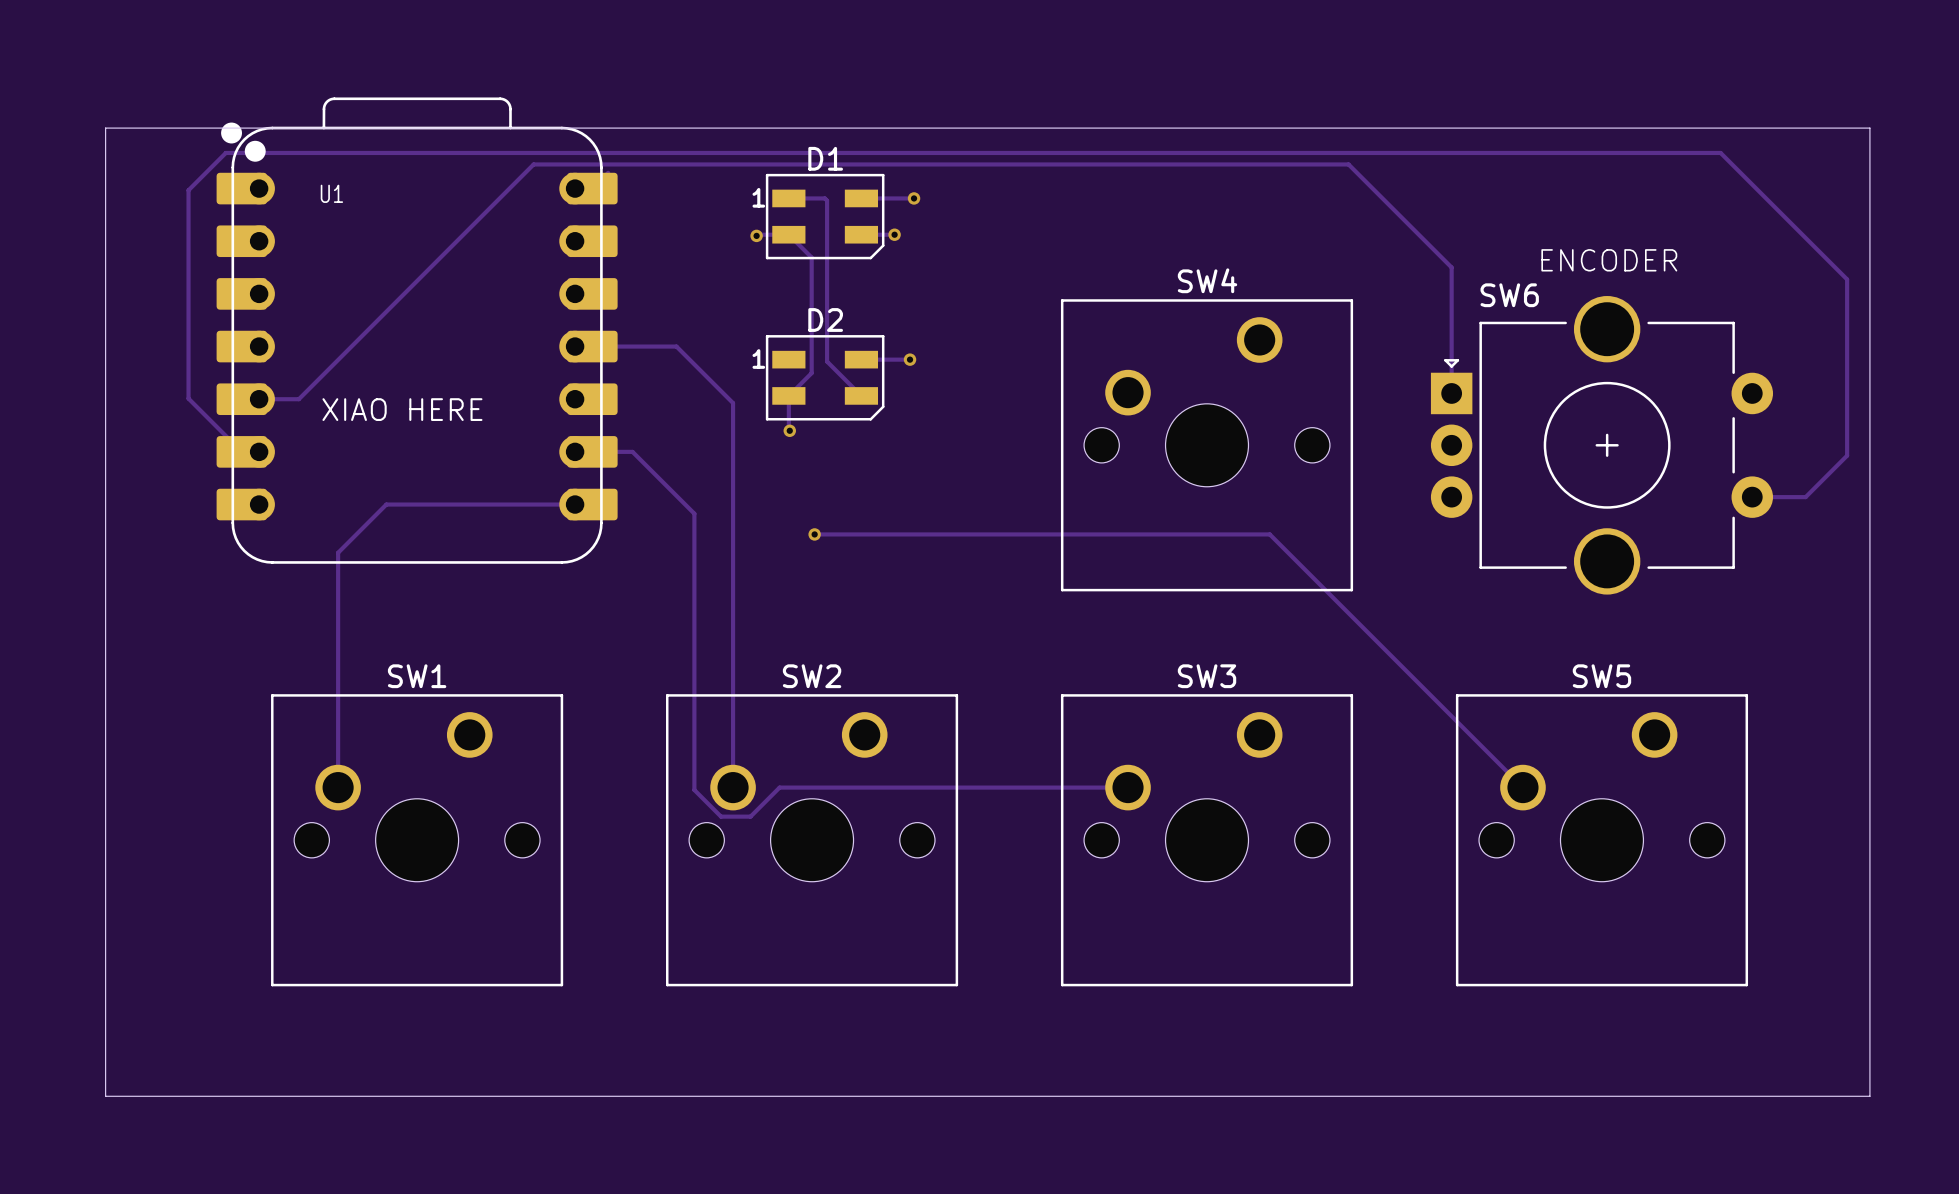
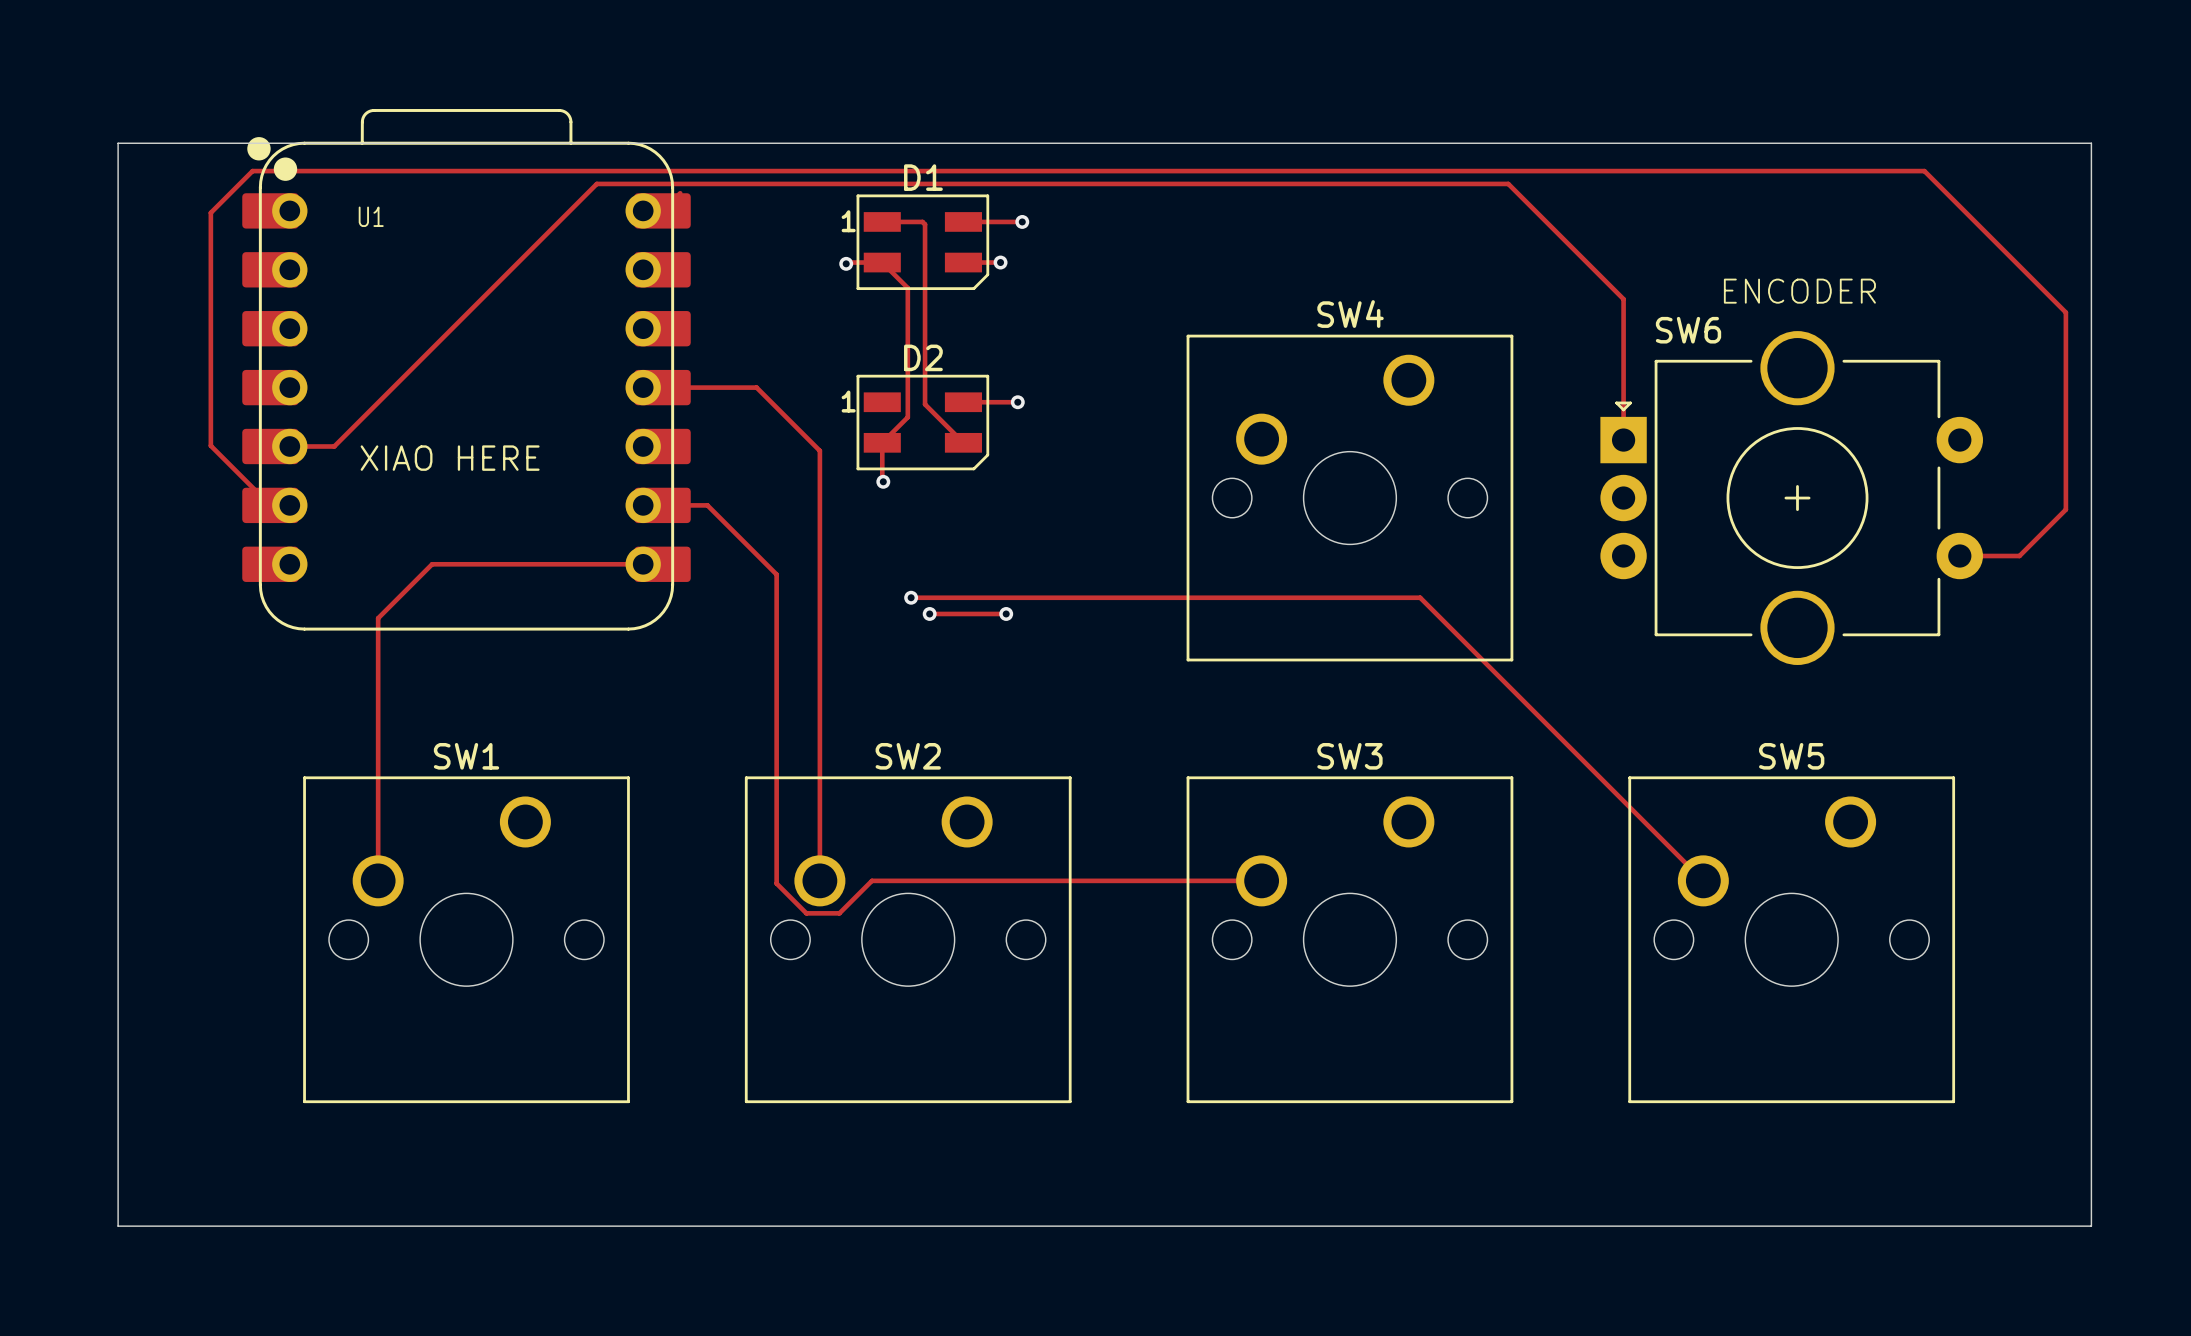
track: none -> (929, 613) (1006, 613)
via: none -> (929, 613)
via: none -> (1006, 613)

